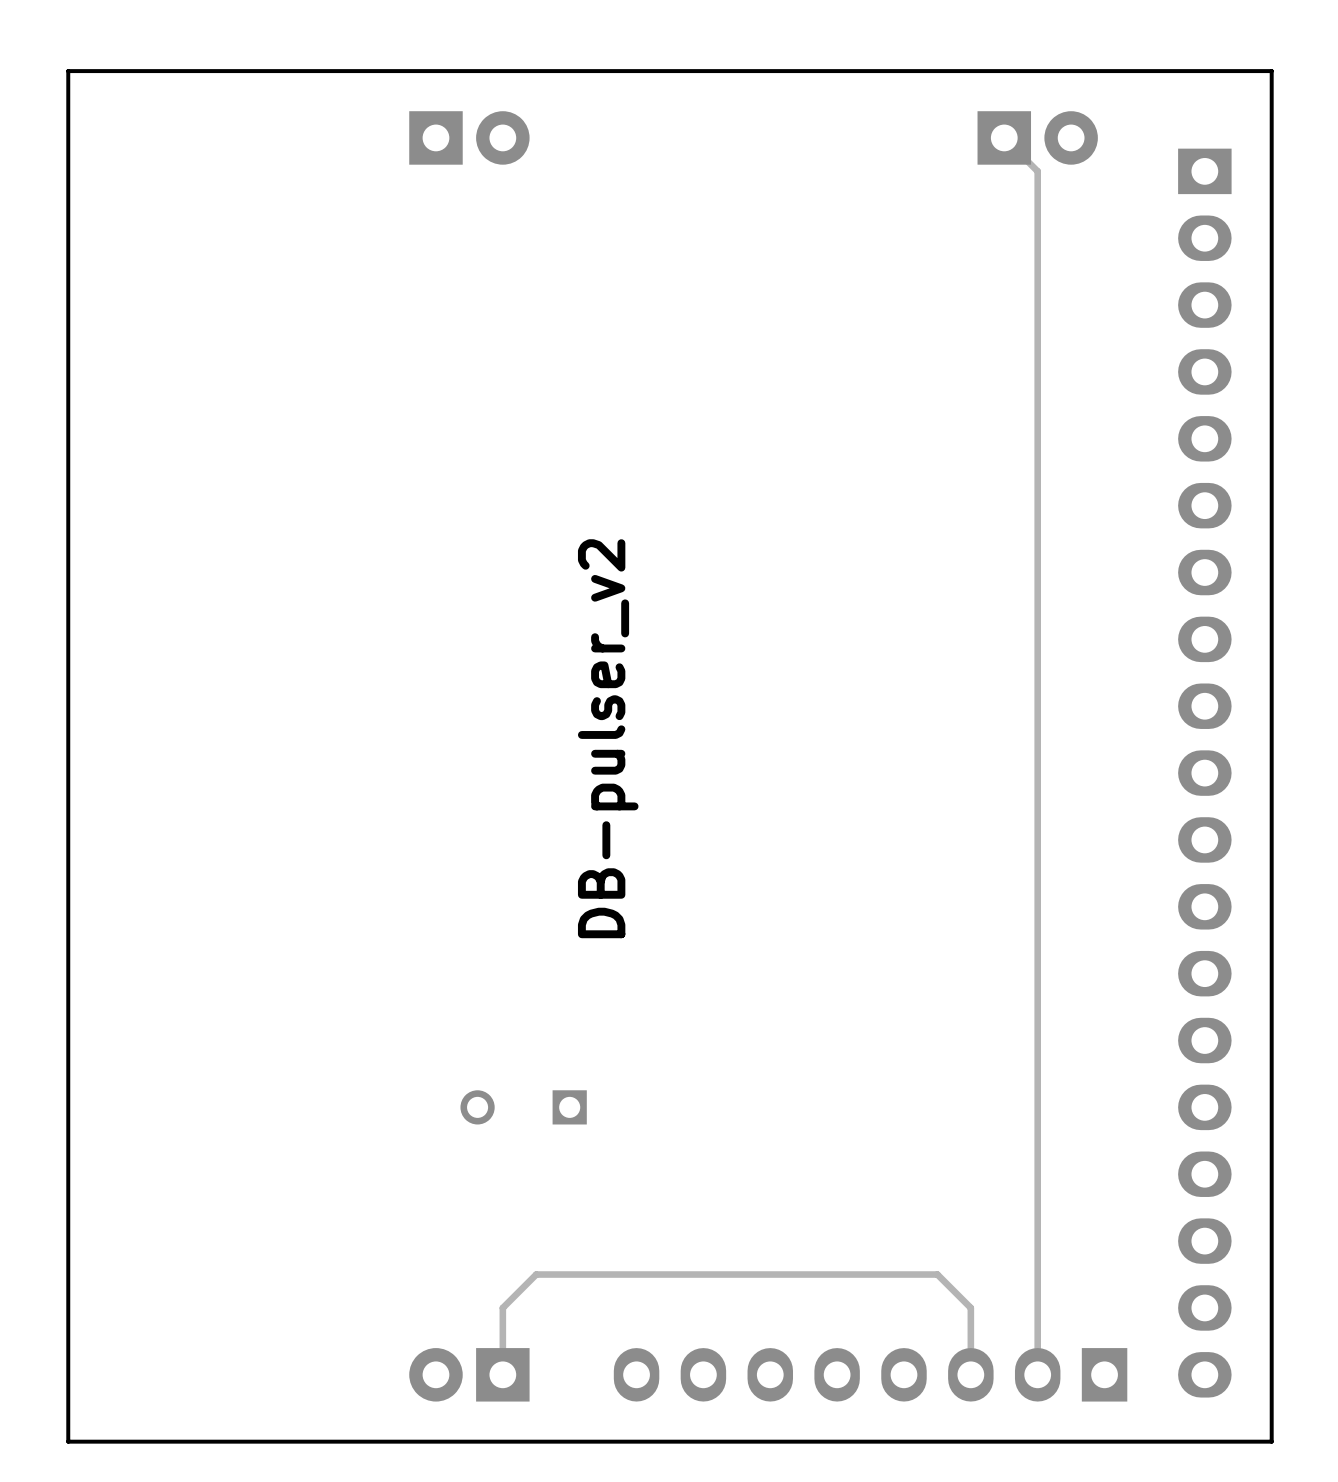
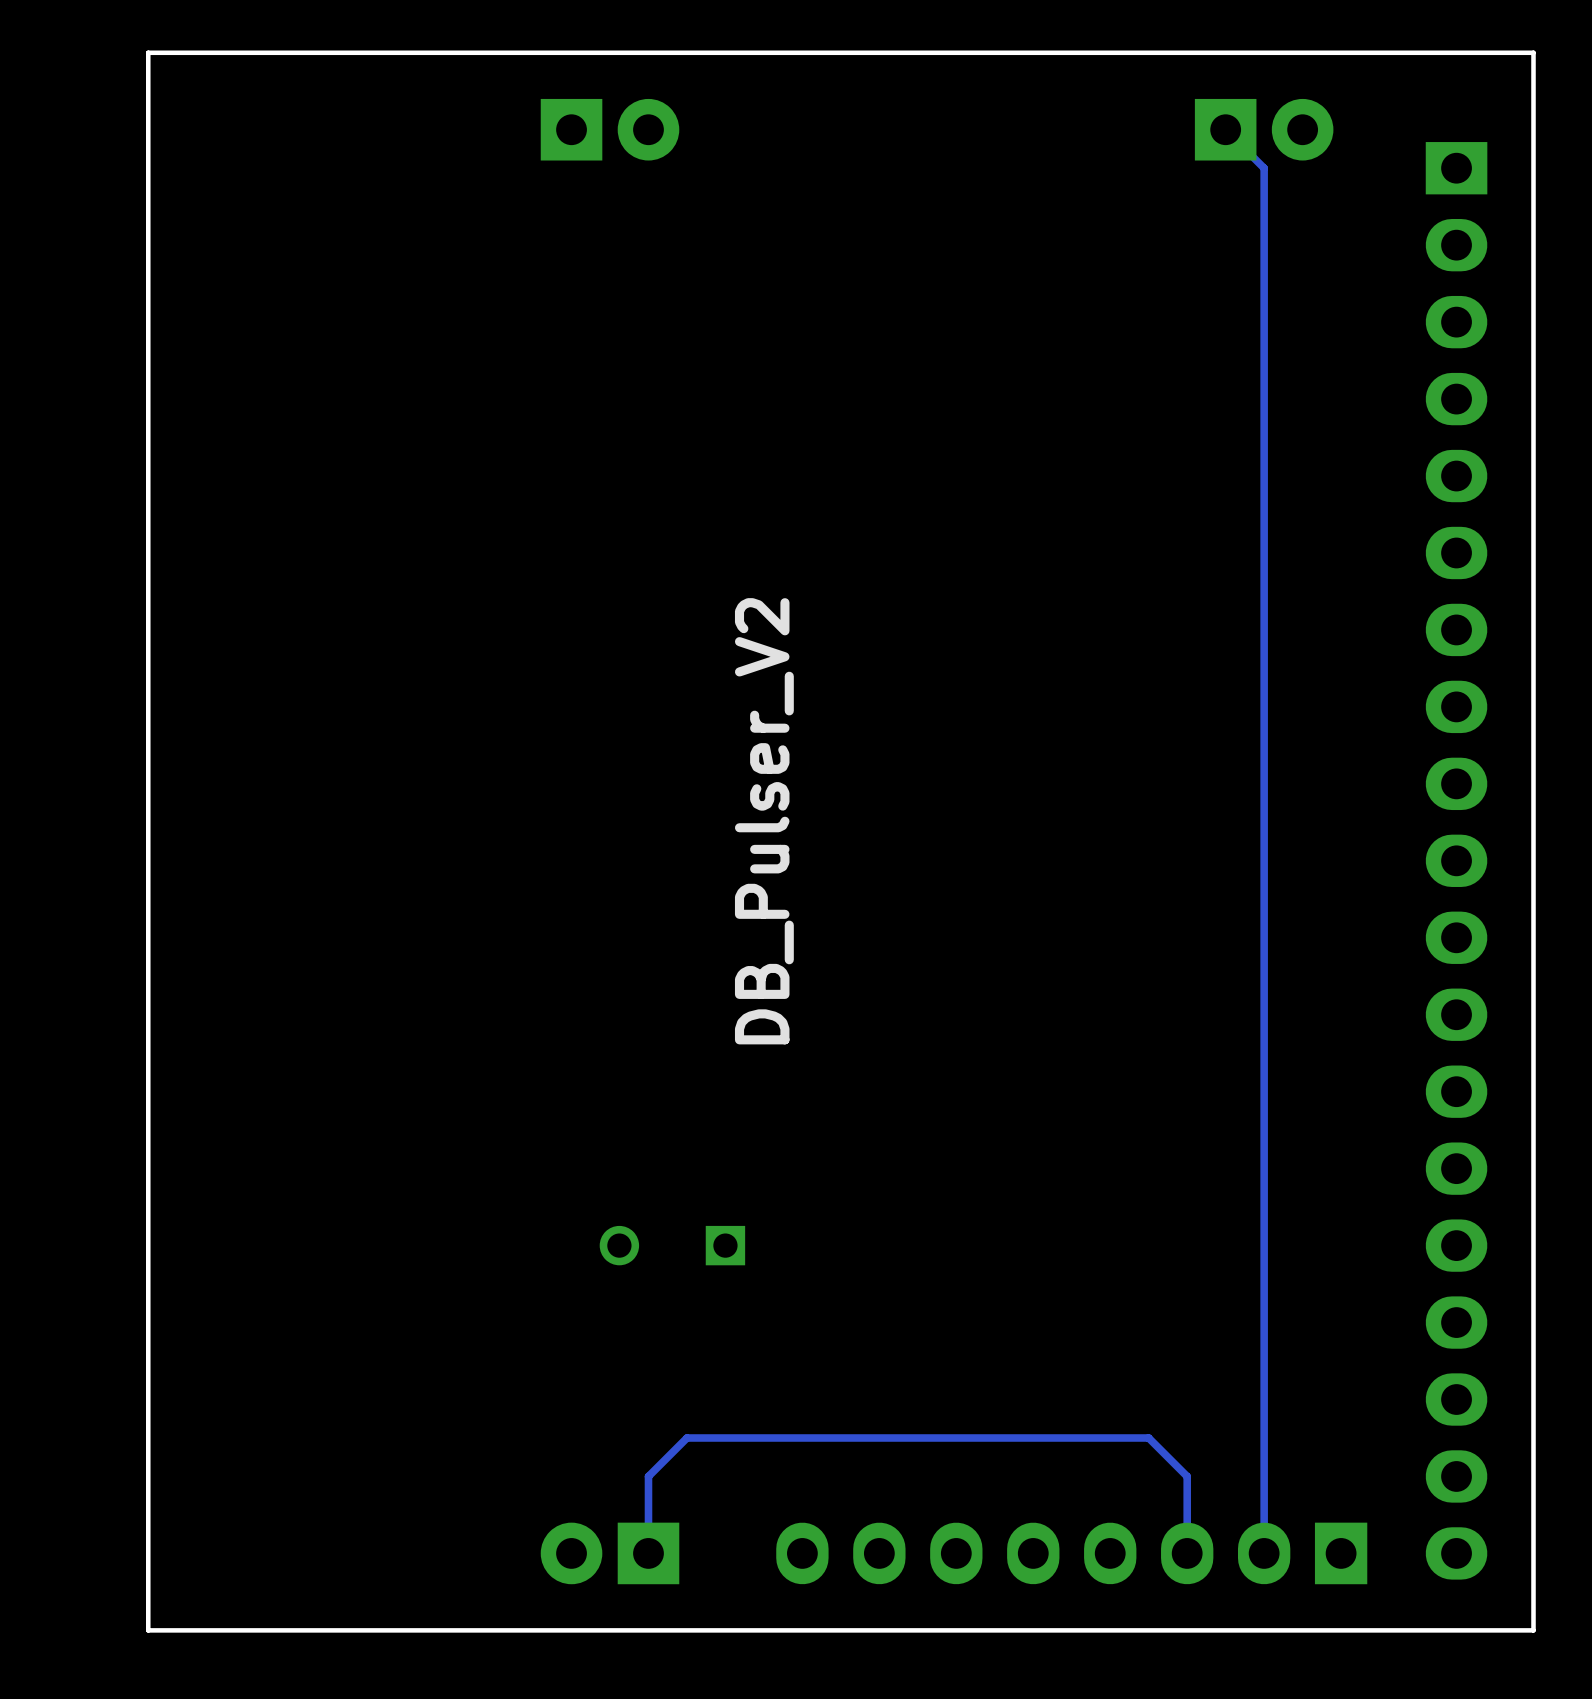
text: DB-pulser_v2 (608, 738) -> DB_Pulser_V2 (764, 821)

